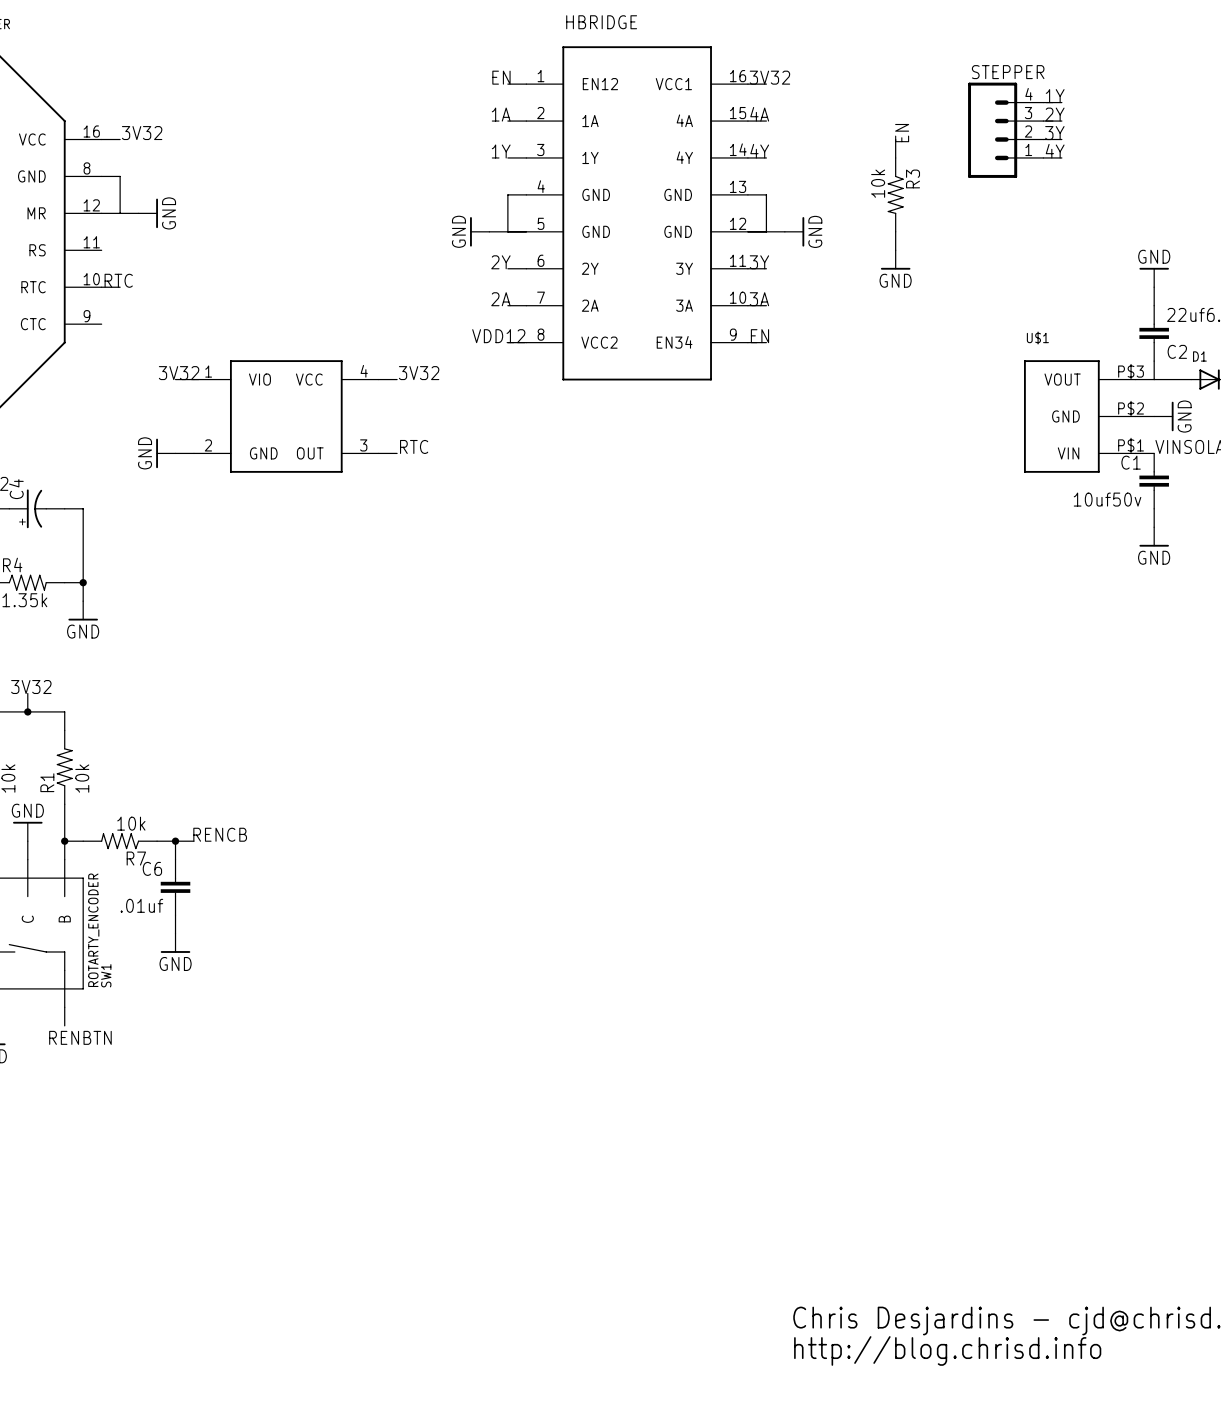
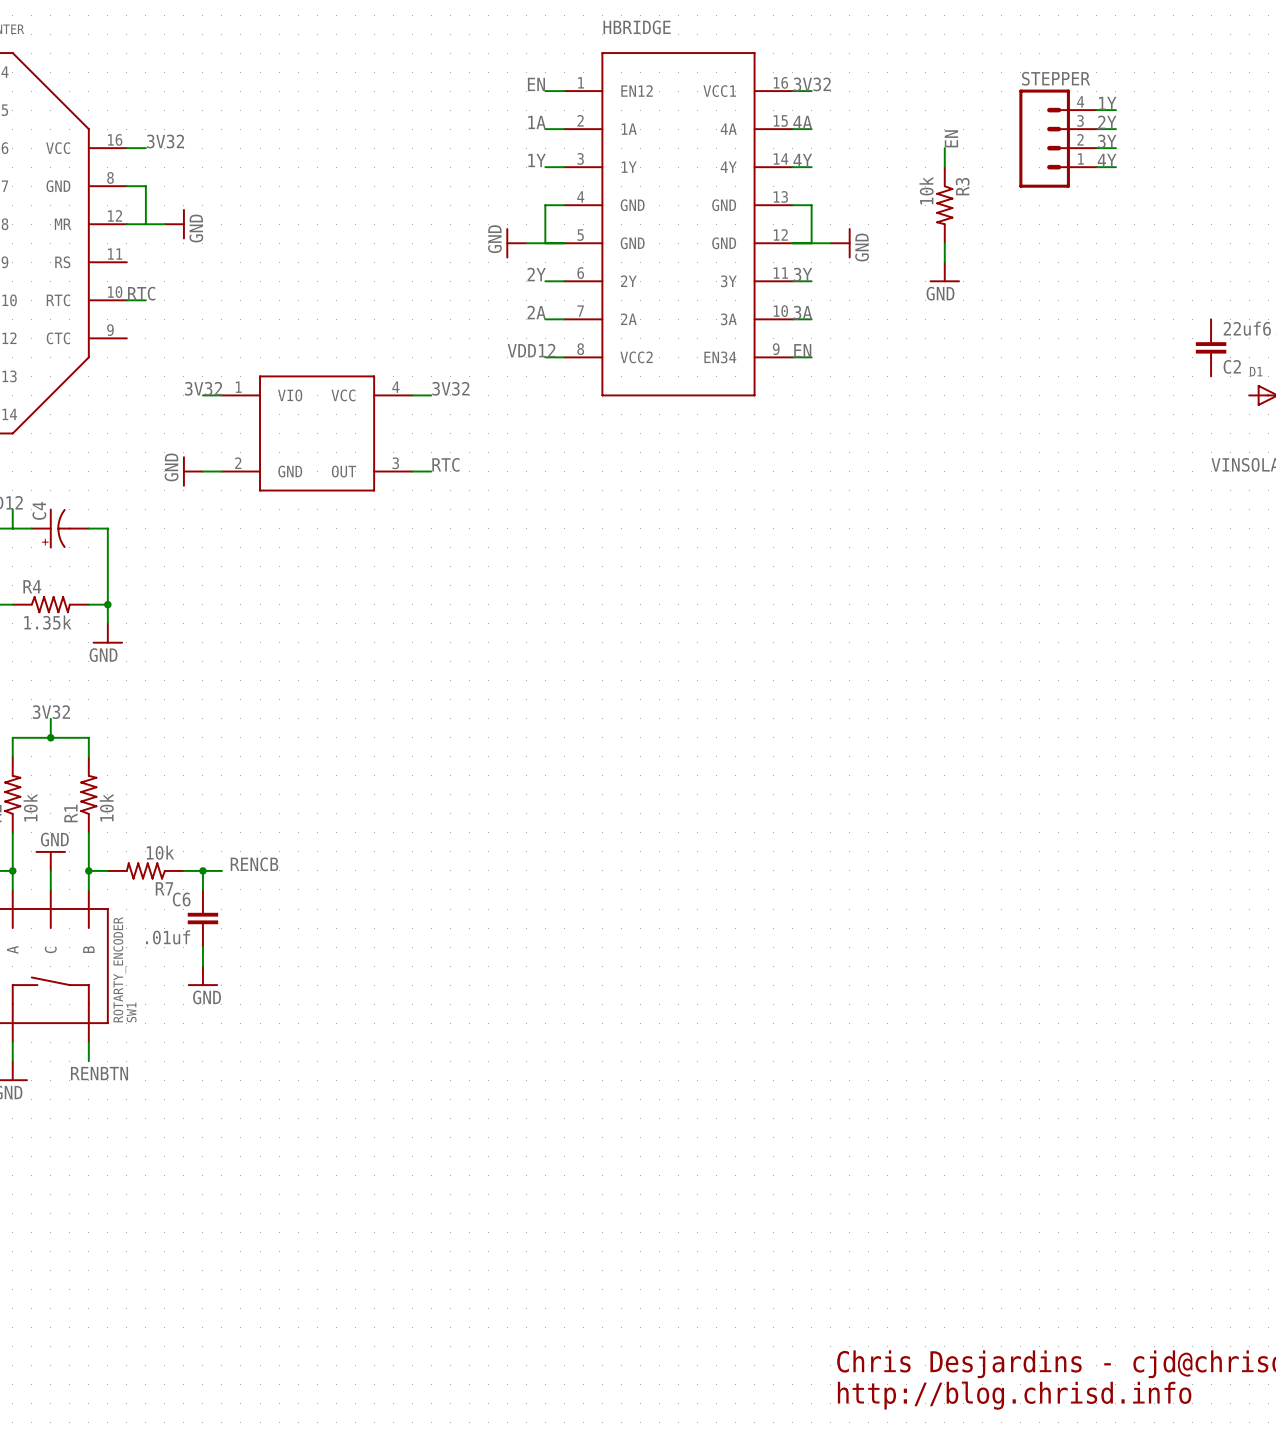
power symbol: GND (1154, 277) -> none
wire: (1154, 287) (1154, 305) -> none
wire: (1154, 361) (1154, 379) -> none
wire: (1135, 379) (1191, 379) -> none
U$1: (1079, 416) -> none
wire: (1135, 416) (1154, 416) -> none
power symbol: GND (1163, 416) -> none
wire: (1135, 453) (1154, 453) -> none
C1: 10uf50v (1154, 481) -> none
wire: (1154, 508) (1154, 527) -> none
power symbol: GND (1154, 536) -> none

